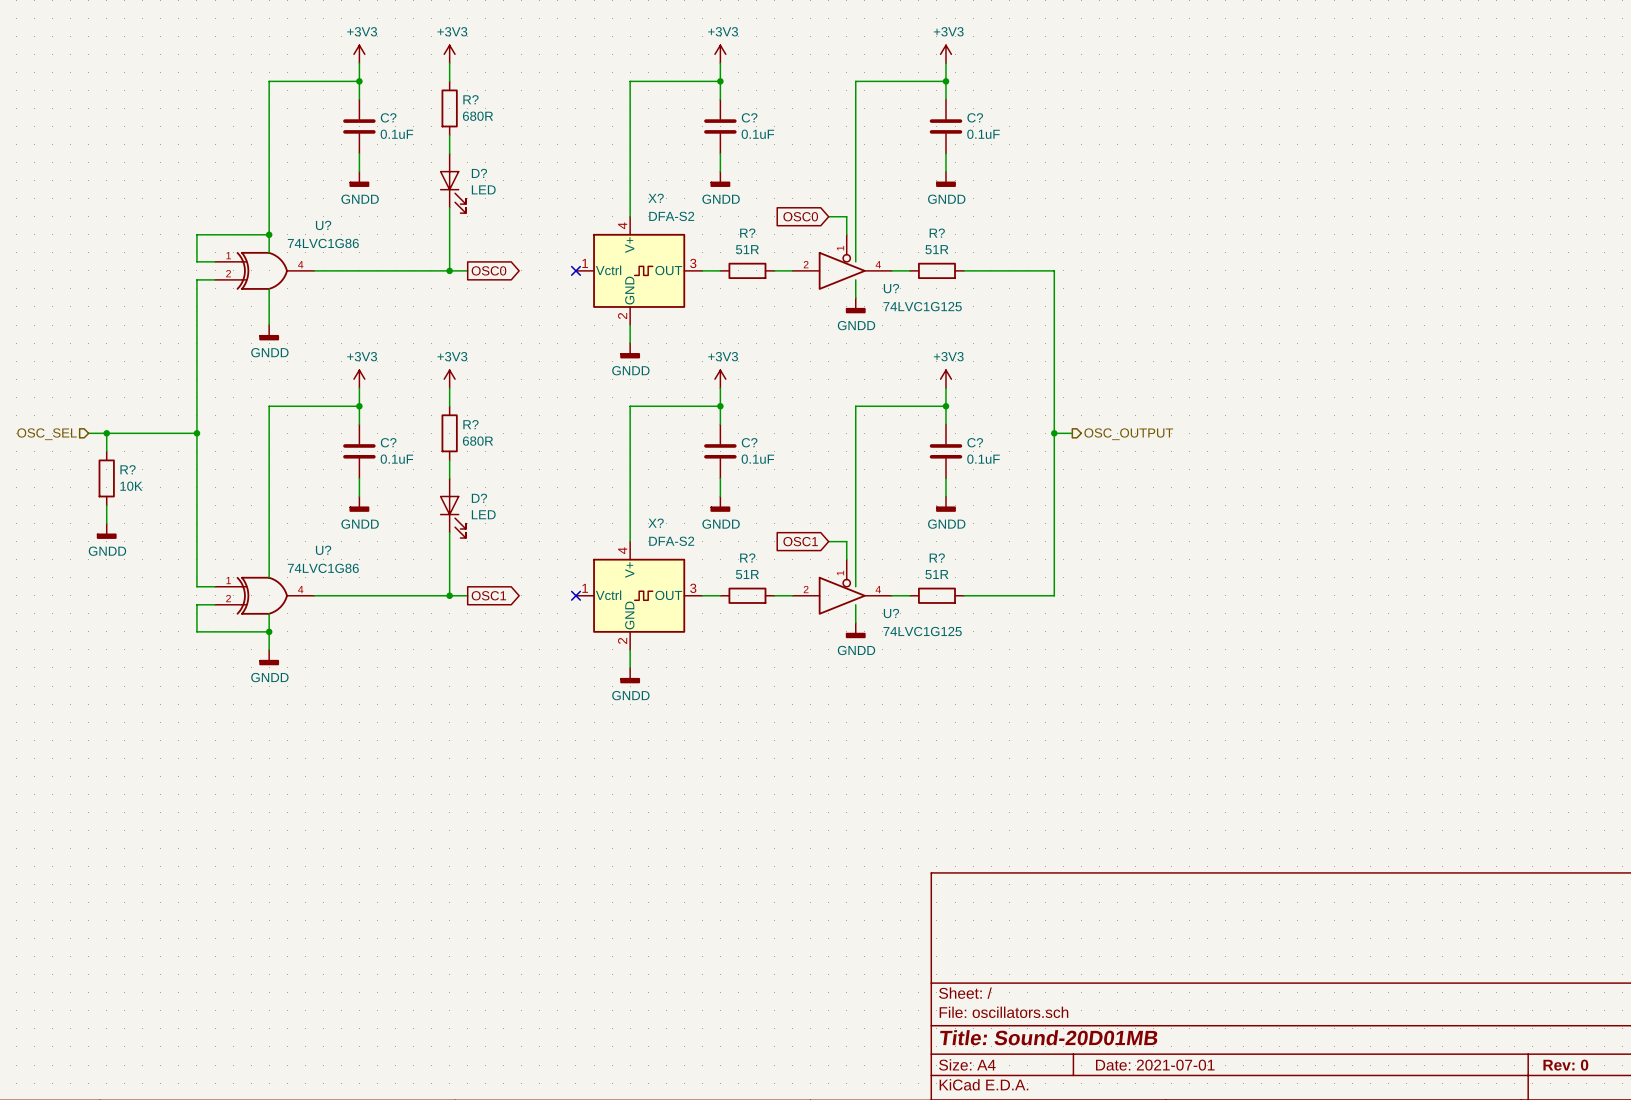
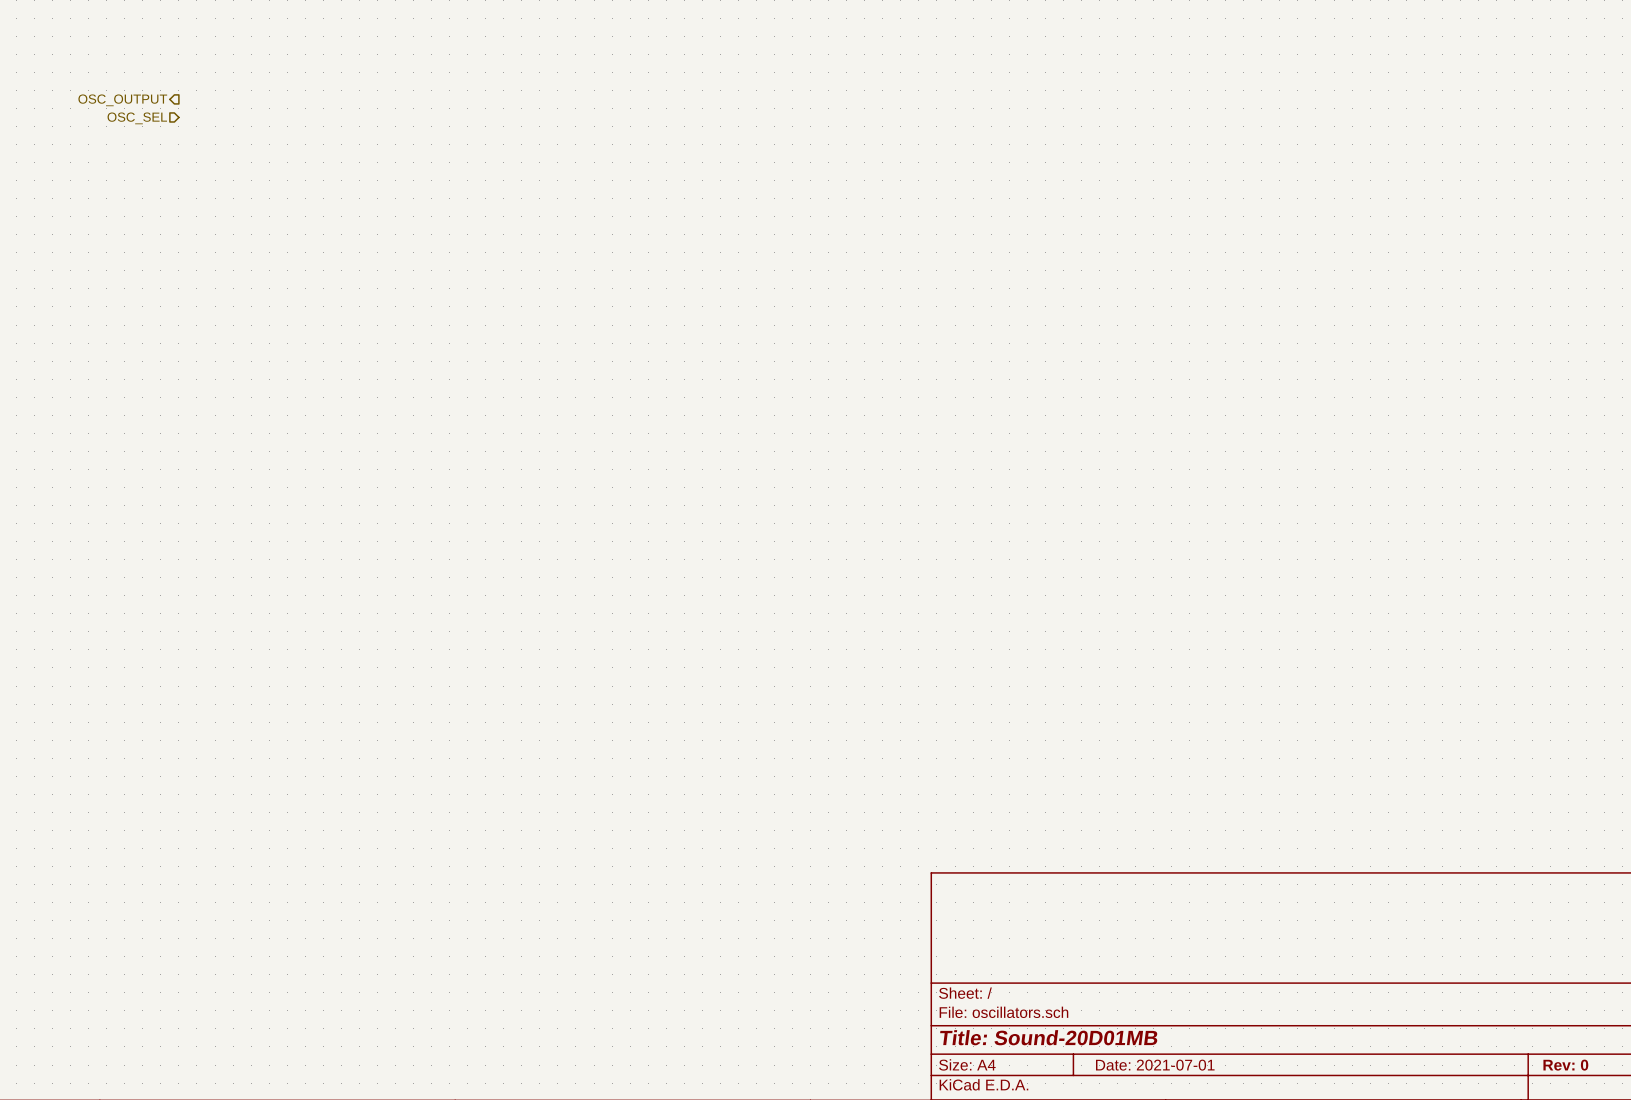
power symbol: +3V3 (359, 54) -> none
power symbol: +3V3 (449, 54) -> none
power symbol: +3V3 (720, 54) -> none
power symbol: +3V3 (945, 54) -> none
wire: (359, 63) (359, 99) -> none
wire: (449, 63) (449, 81) -> none
wire: (720, 63) (720, 99) -> none
wire: (945, 63) (945, 99) -> none
wire: (359, 81) (269, 81) (269, 252) -> none
junction: (359, 81) -> none
wire: (720, 81) (630, 81) (630, 216) -> none
junction: (720, 81) -> none
wire: (945, 81) (855, 81) (855, 261) -> none
junction: (945, 81) -> none
hierarchical label: none -> OSC_OUTPUT (122, 100)
R?: 680R (449, 108) -> none
hierarchical label: none -> OSC_SEL (137, 118)
C?: 0.1uF (359, 126) -> none
C?: 0.1uF (720, 126) -> none
C?: 0.1uF (945, 126) -> none
wire: (449, 135) (449, 153) -> none
wire: (359, 153) (359, 171) -> none
wire: (720, 153) (720, 171) -> none
wire: (945, 153) (945, 171) -> none
power symbol: GNDD (359, 179) -> none
power symbol: GNDD (720, 179) -> none
power symbol: GNDD (945, 179) -> none
D?: LED (452, 183) -> none
wire: (449, 207) (449, 270) -> none
global label: OSC0 (800, 216) -> none
wire: (828, 216) (846, 216) (846, 234) -> none
wire: (269, 234) (196, 234) (196, 261) (215, 261) -> none
junction: (269, 234) -> none
U?: 74LVC1G125 (842, 262) -> none
U?: 74LVC1G86 (264, 270) -> none
wire: (314, 270) (467, 270) -> none
junction: (449, 270) -> none
global label: OSC0 (488, 270) -> none
no-connect mark: (575, 270) -> none
X?: DFA-S2 (639, 270) -> none
wire: (702, 270) (720, 270) -> none
R?: 51R (747, 270) -> none
wire: (774, 270) (792, 270) -> none
wire: (891, 270) (909, 270) -> none
R?: 51R (936, 270) -> none
wire: (964, 270) (1054, 270) (1054, 595) (964, 595) -> none
wire: (215, 279) (196, 279) (196, 586) (215, 586) -> none
wire: (855, 279) (855, 297) -> none
wire: (269, 288) (269, 325) -> none
power symbol: GNDD (855, 305) -> none
wire: (630, 325) (630, 343) -> none
power symbol: GNDD (269, 332) -> none
power symbol: GNDD (630, 350) -> none
power symbol: +3V3 (359, 379) -> none
power symbol: +3V3 (449, 379) -> none
power symbol: +3V3 (720, 379) -> none
power symbol: +3V3 (945, 379) -> none
wire: (359, 388) (359, 424) -> none
wire: (449, 388) (449, 406) -> none
wire: (720, 388) (720, 424) -> none
wire: (945, 388) (945, 424) -> none
wire: (359, 406) (269, 406) (269, 577) -> none
junction: (359, 406) -> none
wire: (720, 406) (630, 406) (630, 541) -> none
junction: (720, 406) -> none
wire: (945, 406) (855, 406) (855, 586) -> none
junction: (945, 406) -> none
wire: (88, 433) (196, 433) -> none
wire: (106, 433) (106, 451) -> none
junction: (106, 433) -> none
junction: (196, 433) -> none
R?: 680R (449, 433) -> none
wire: (1054, 433) (1072, 433) -> none
junction: (1054, 433) -> none
hierarchical label: OSC_SEL (47, 434) -> none
hierarchical label: OSC_OUTPUT (1128, 434) -> none
C?: 0.1uF (359, 451) -> none
C?: 0.1uF (720, 451) -> none
C?: 0.1uF (945, 451) -> none
wire: (449, 460) (449, 478) -> none
R?: 10K (106, 478) -> none
wire: (359, 478) (359, 496) -> none
wire: (720, 478) (720, 496) -> none
wire: (945, 478) (945, 496) -> none
power symbol: GNDD (359, 504) -> none
power symbol: GNDD (720, 504) -> none
power symbol: GNDD (945, 504) -> none
wire: (106, 505) (106, 523) -> none
D?: LED (452, 508) -> none
power symbol: GNDD (106, 531) -> none
wire: (449, 532) (449, 595) -> none
global label: OSC1 (800, 541) -> none
wire: (828, 541) (846, 541) (846, 559) -> none
U?: 74LVC1G125 (842, 587) -> none
U?: 74LVC1G86 (264, 595) -> none
wire: (314, 595) (467, 595) -> none
junction: (449, 595) -> none
global label: OSC1 (488, 595) -> none
no-connect mark: (575, 595) -> none
X?: DFA-S2 (639, 595) -> none
wire: (702, 595) (720, 595) -> none
R?: 51R (747, 595) -> none
wire: (774, 595) (792, 595) -> none
wire: (891, 595) (909, 595) -> none
R?: 51R (936, 595) -> none
wire: (215, 604) (196, 604) (196, 631) (269, 631) -> none
wire: (855, 604) (855, 622) -> none
wire: (269, 613) (269, 649) -> none
power symbol: GNDD (855, 630) -> none
junction: (269, 631) -> none
wire: (630, 649) (630, 667) -> none
power symbol: GNDD (269, 657) -> none
power symbol: GNDD (630, 675) -> none

